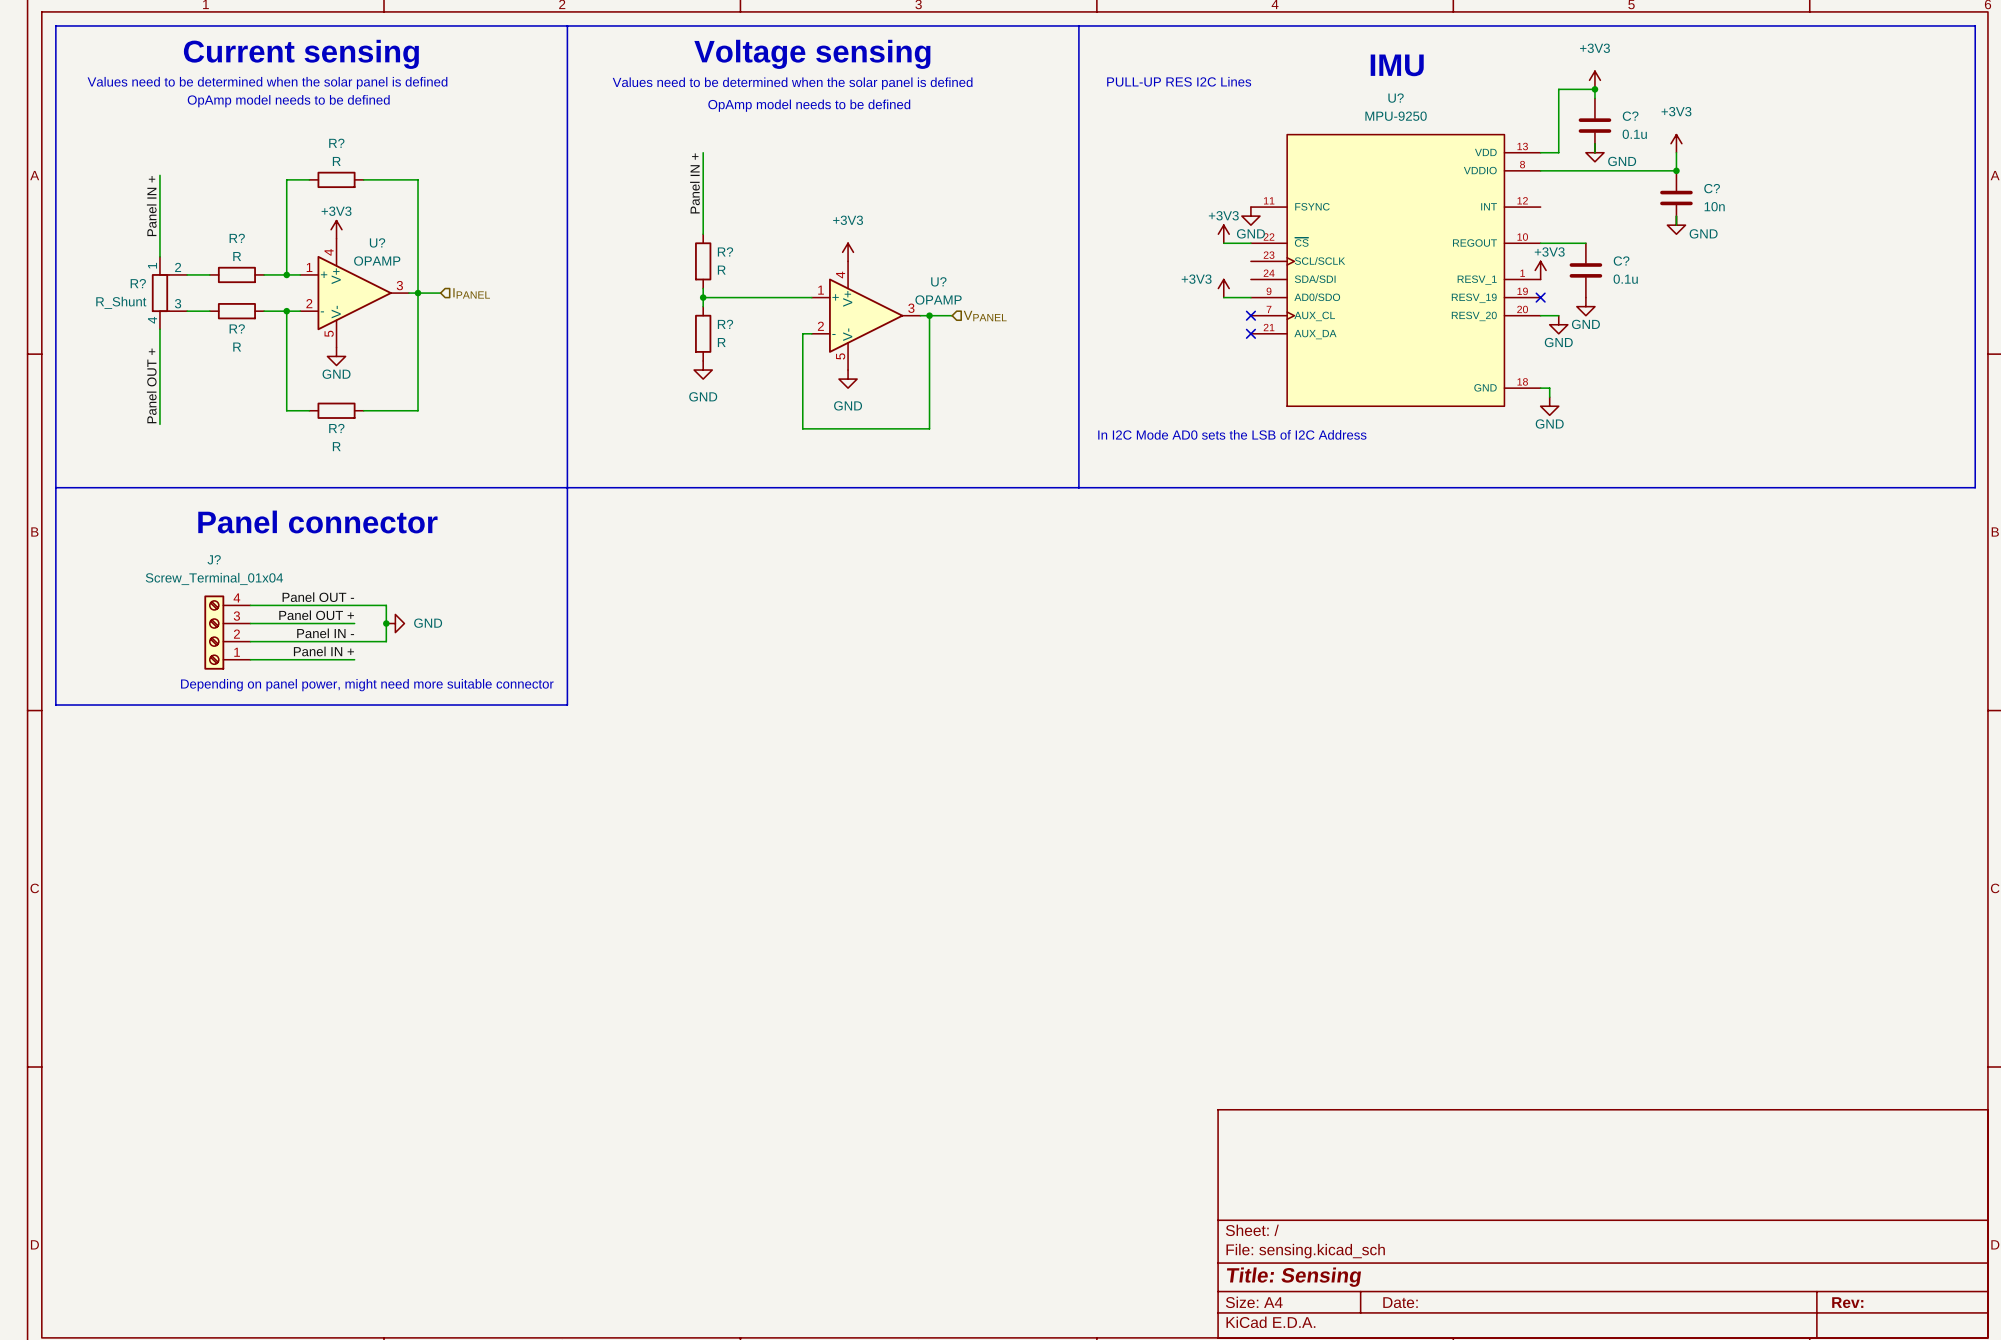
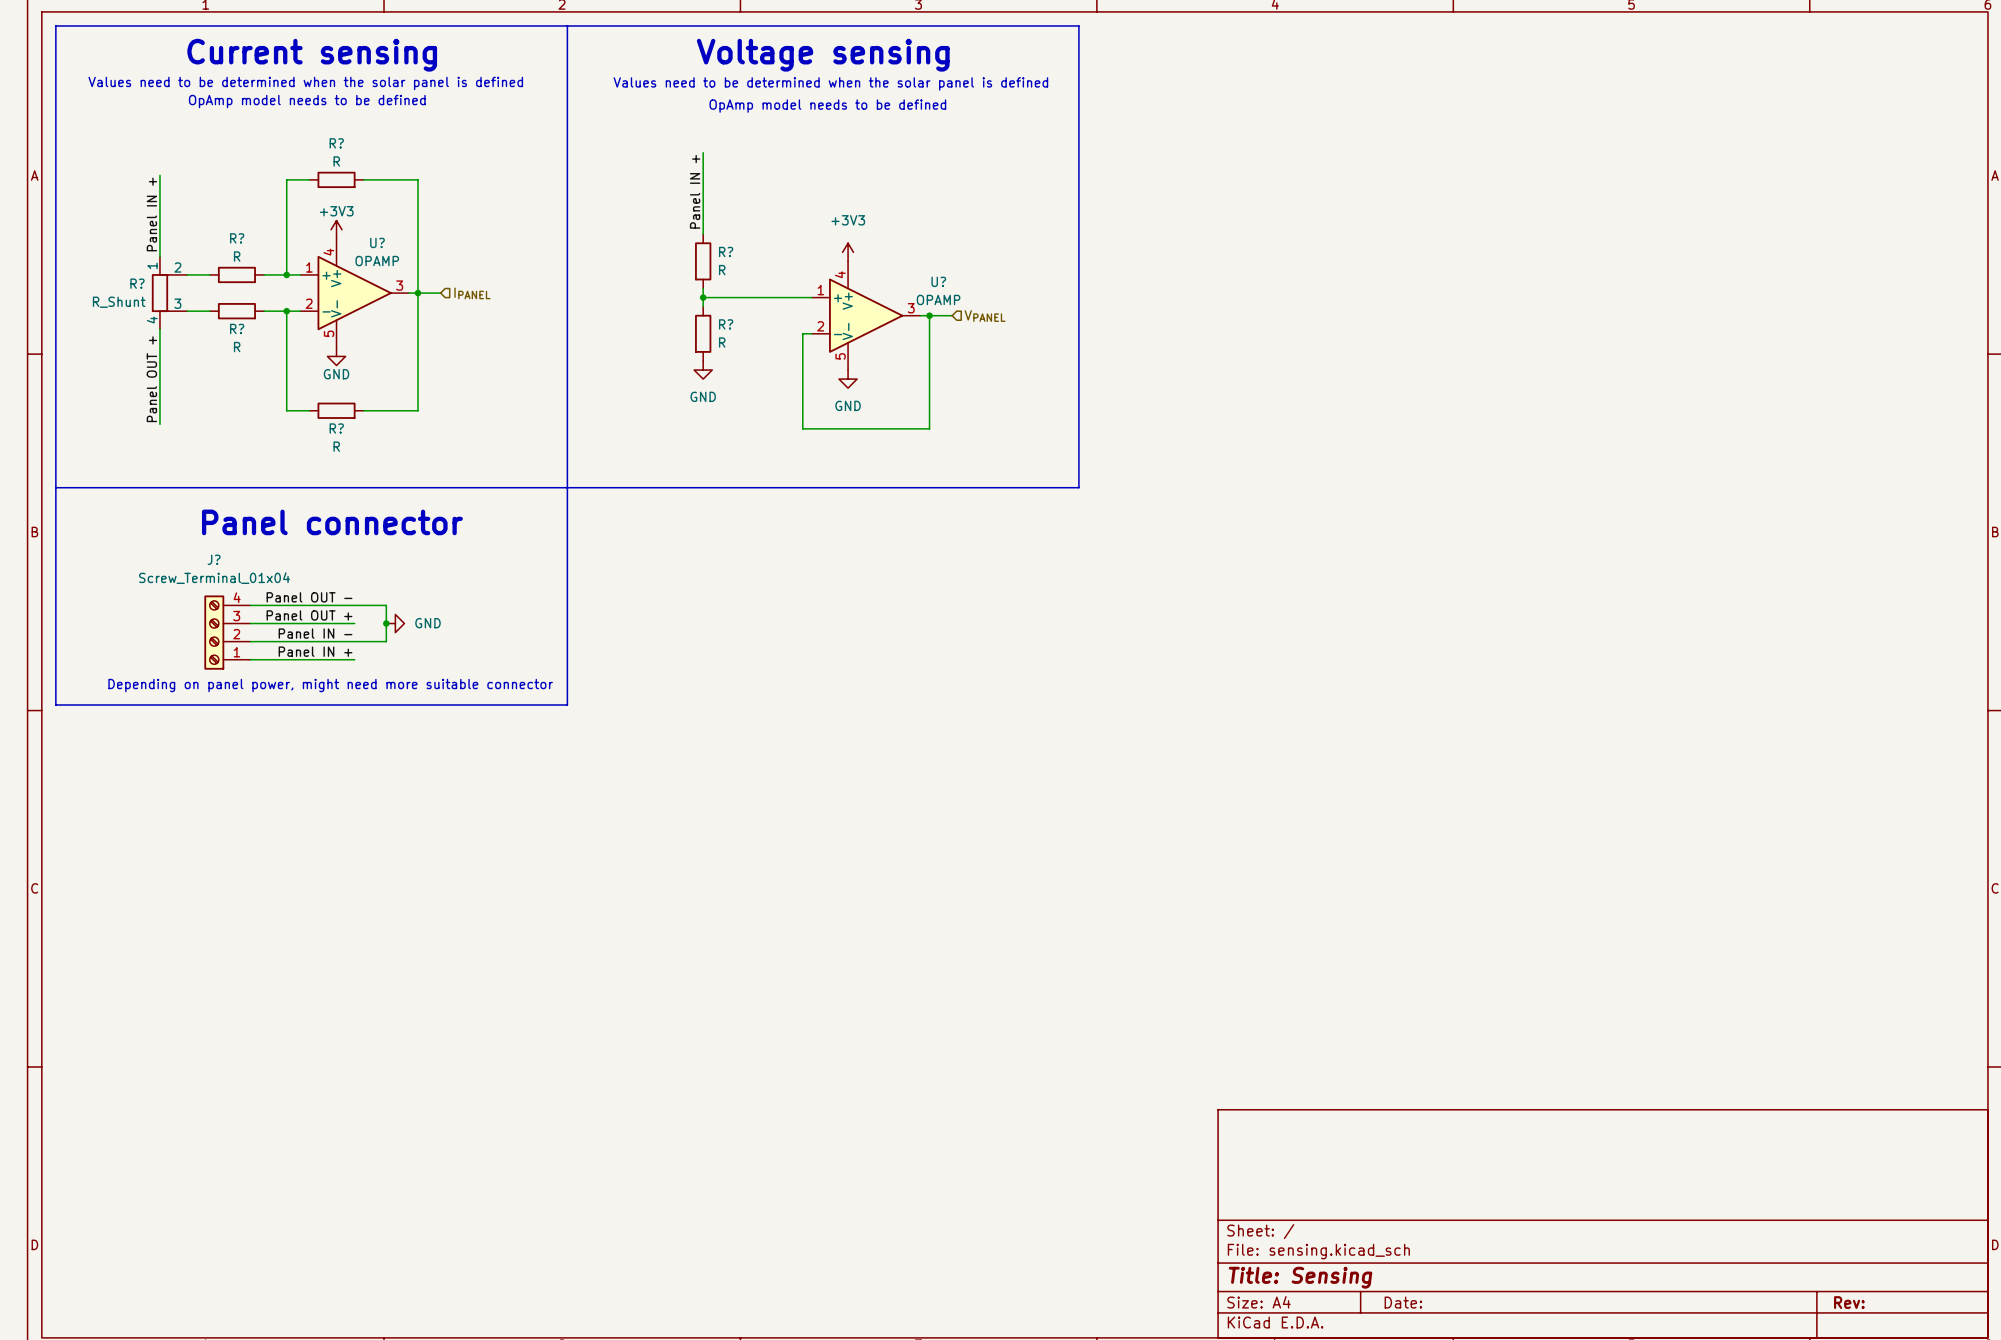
line: (1078, 25) (1975, 25) (1975, 487) (1078, 487) -> none
text: IMU (1397, 65) -> none
power symbol: +3V3 (1594, 80) -> none
text: PULL-UP RES I2C Lines (1179, 81) -> none
junction: (1594, 89) -> none
wire: (1594, 98) (1594, 89) (1558, 89) (1558, 152) (1540, 152) -> none
C?: 0.1u (1594, 125) -> none
wire: (1594, 143) (1594, 152) -> none
power symbol: +3V3 (1676, 143) -> none
power symbol: GND (1594, 152) -> none
wire: (1676, 152) (1676, 170) (1540, 170) -> none
junction: (1676, 170) -> none
C?: 10n (1676, 198) -> none
power symbol: GND (1250, 216) -> none
wire: (1676, 216) (1676, 225) -> none
power symbol: GND (1676, 225) -> none
power symbol: +3V3 (1223, 234) -> none
wire: (1223, 243) (1250, 243) -> none
wire: (1540, 243) (1585, 243) -> none
U?: MPU-9250 (1395, 270) -> none
power symbol: +3V3 (1540, 270) -> none
C?: 0.1u (1585, 270) -> none
power symbol: +3V3 (1223, 288) -> none
wire: (1223, 297) (1250, 297) -> none
no-connect mark: (1540, 297) -> none
power symbol: GND (1585, 306) -> none
no-connect mark: (1250, 315) -> none
wire: (1540, 315) (1558, 315) -> none
power symbol: GND (1558, 324) -> none
no-connect mark: (1250, 333) -> none
wire: (1540, 388) (1549, 388) (1549, 397) -> none
power symbol: GND (1549, 406) -> none
text: In I2C Mode AD0 sets the LSB of I2C Address (1232, 434) -> none

